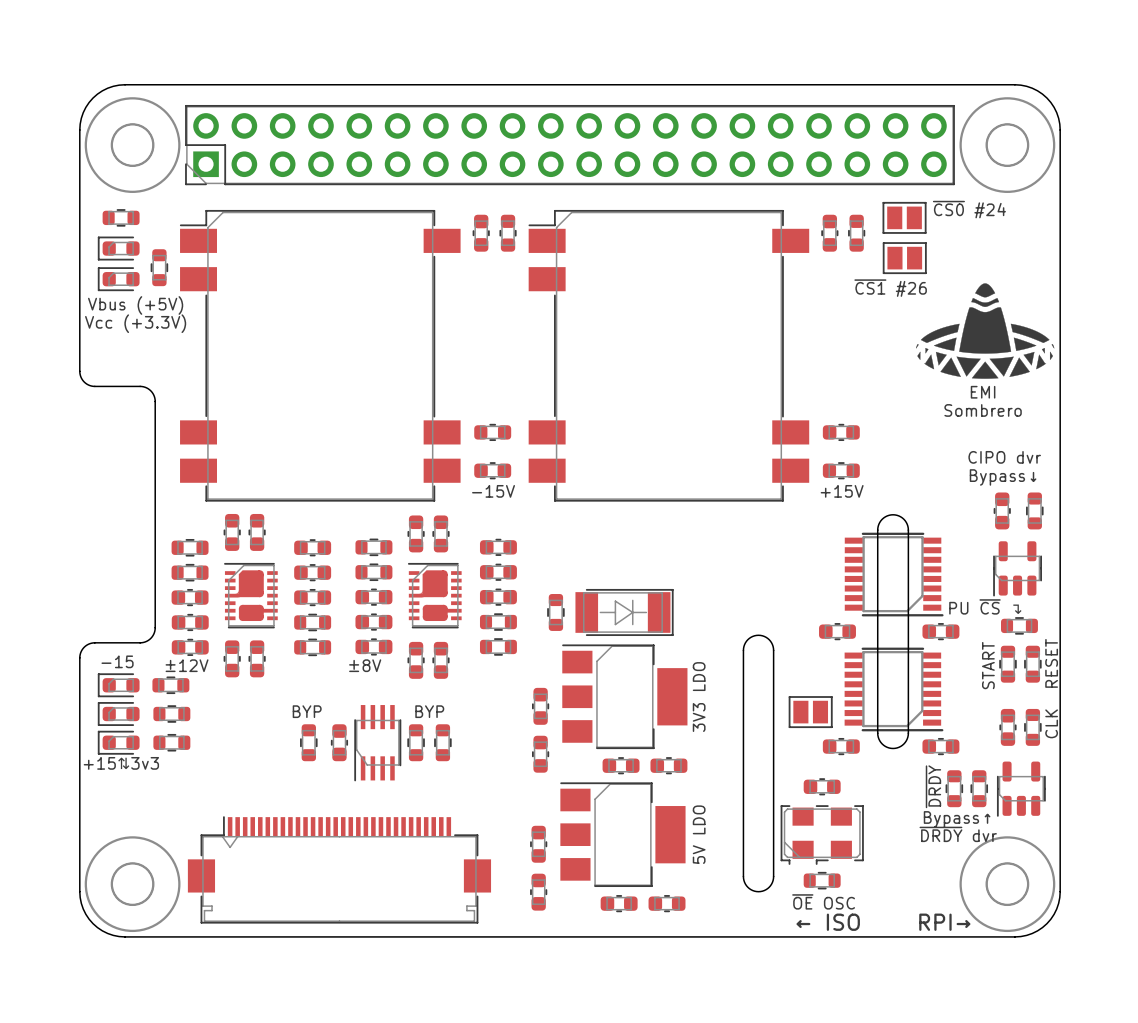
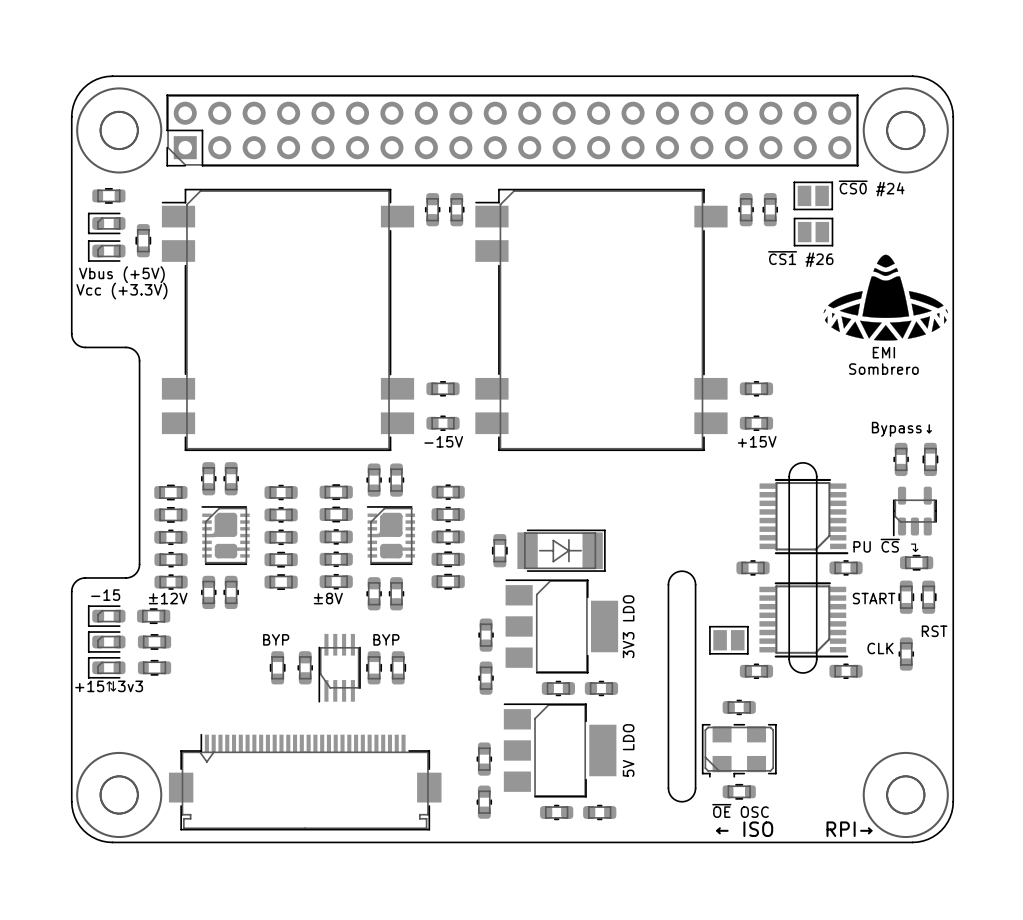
text: CIPO dvr (1004, 457) -> none
text: RESET (1051, 663) -> RST (934, 631)
text rotation: 0° (988, 665) -> 90° clockwise (874, 598)
text rotation: 0° (1051, 723) -> 90° clockwise (880, 648)
text position: CLK (1051, 723) -> CLK (880, 648)
part: (1032, 727) -> none
text: ~{DRDY} (933, 786) -> none
part: (954, 788) -> none
part: (979, 788) -> none
part: (1021, 789) -> none
text: Bypass↑ (957, 819) -> none
text: ~{DRDY} dvr (958, 834) -> none

